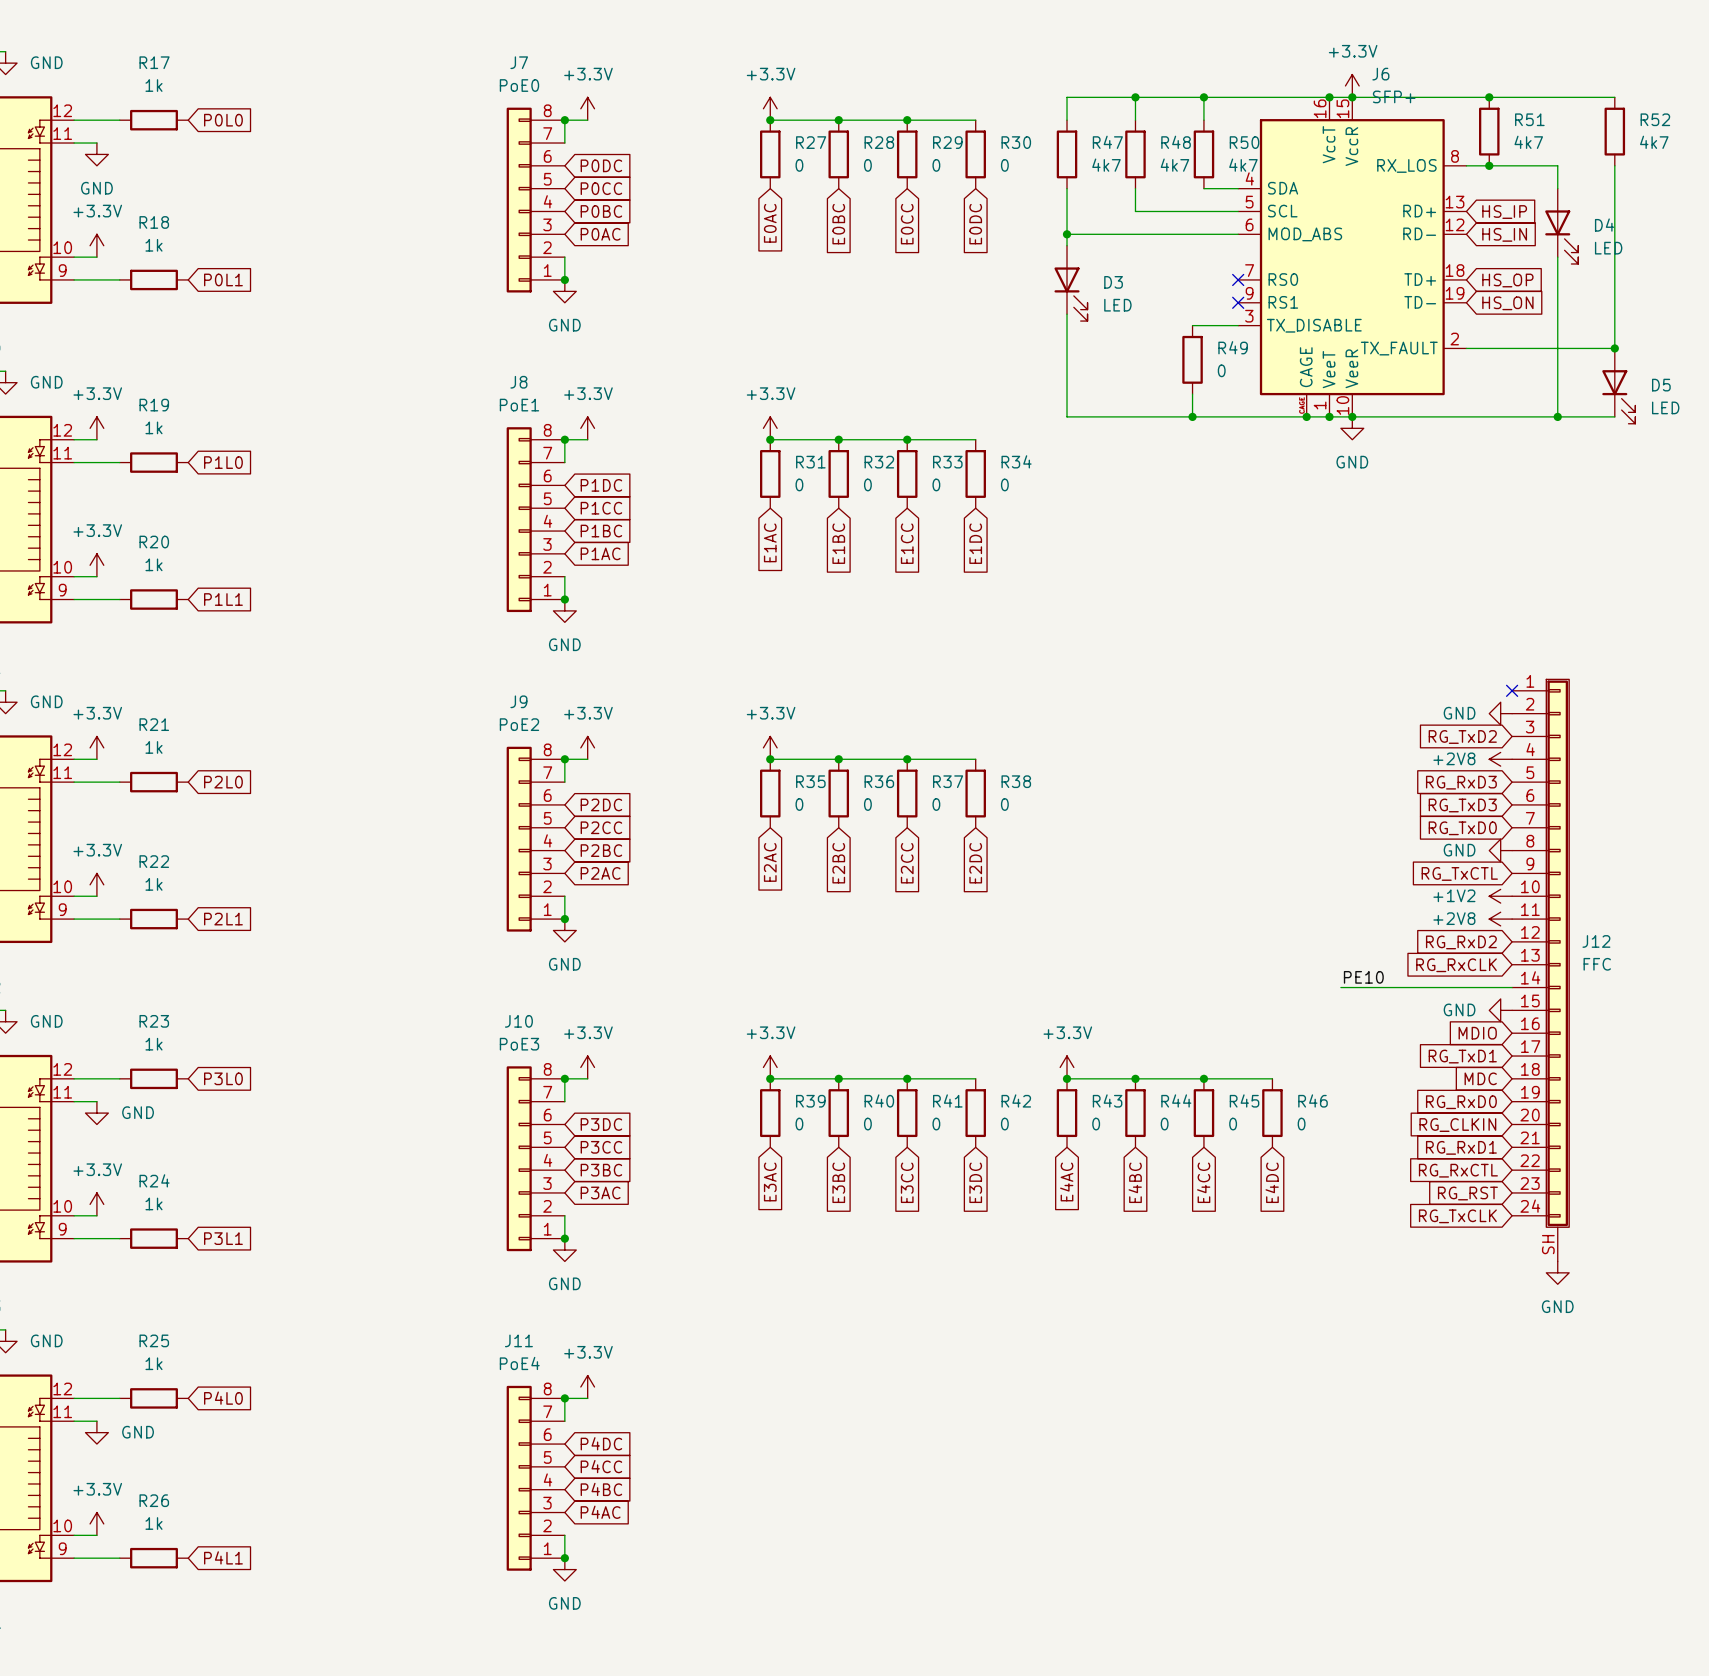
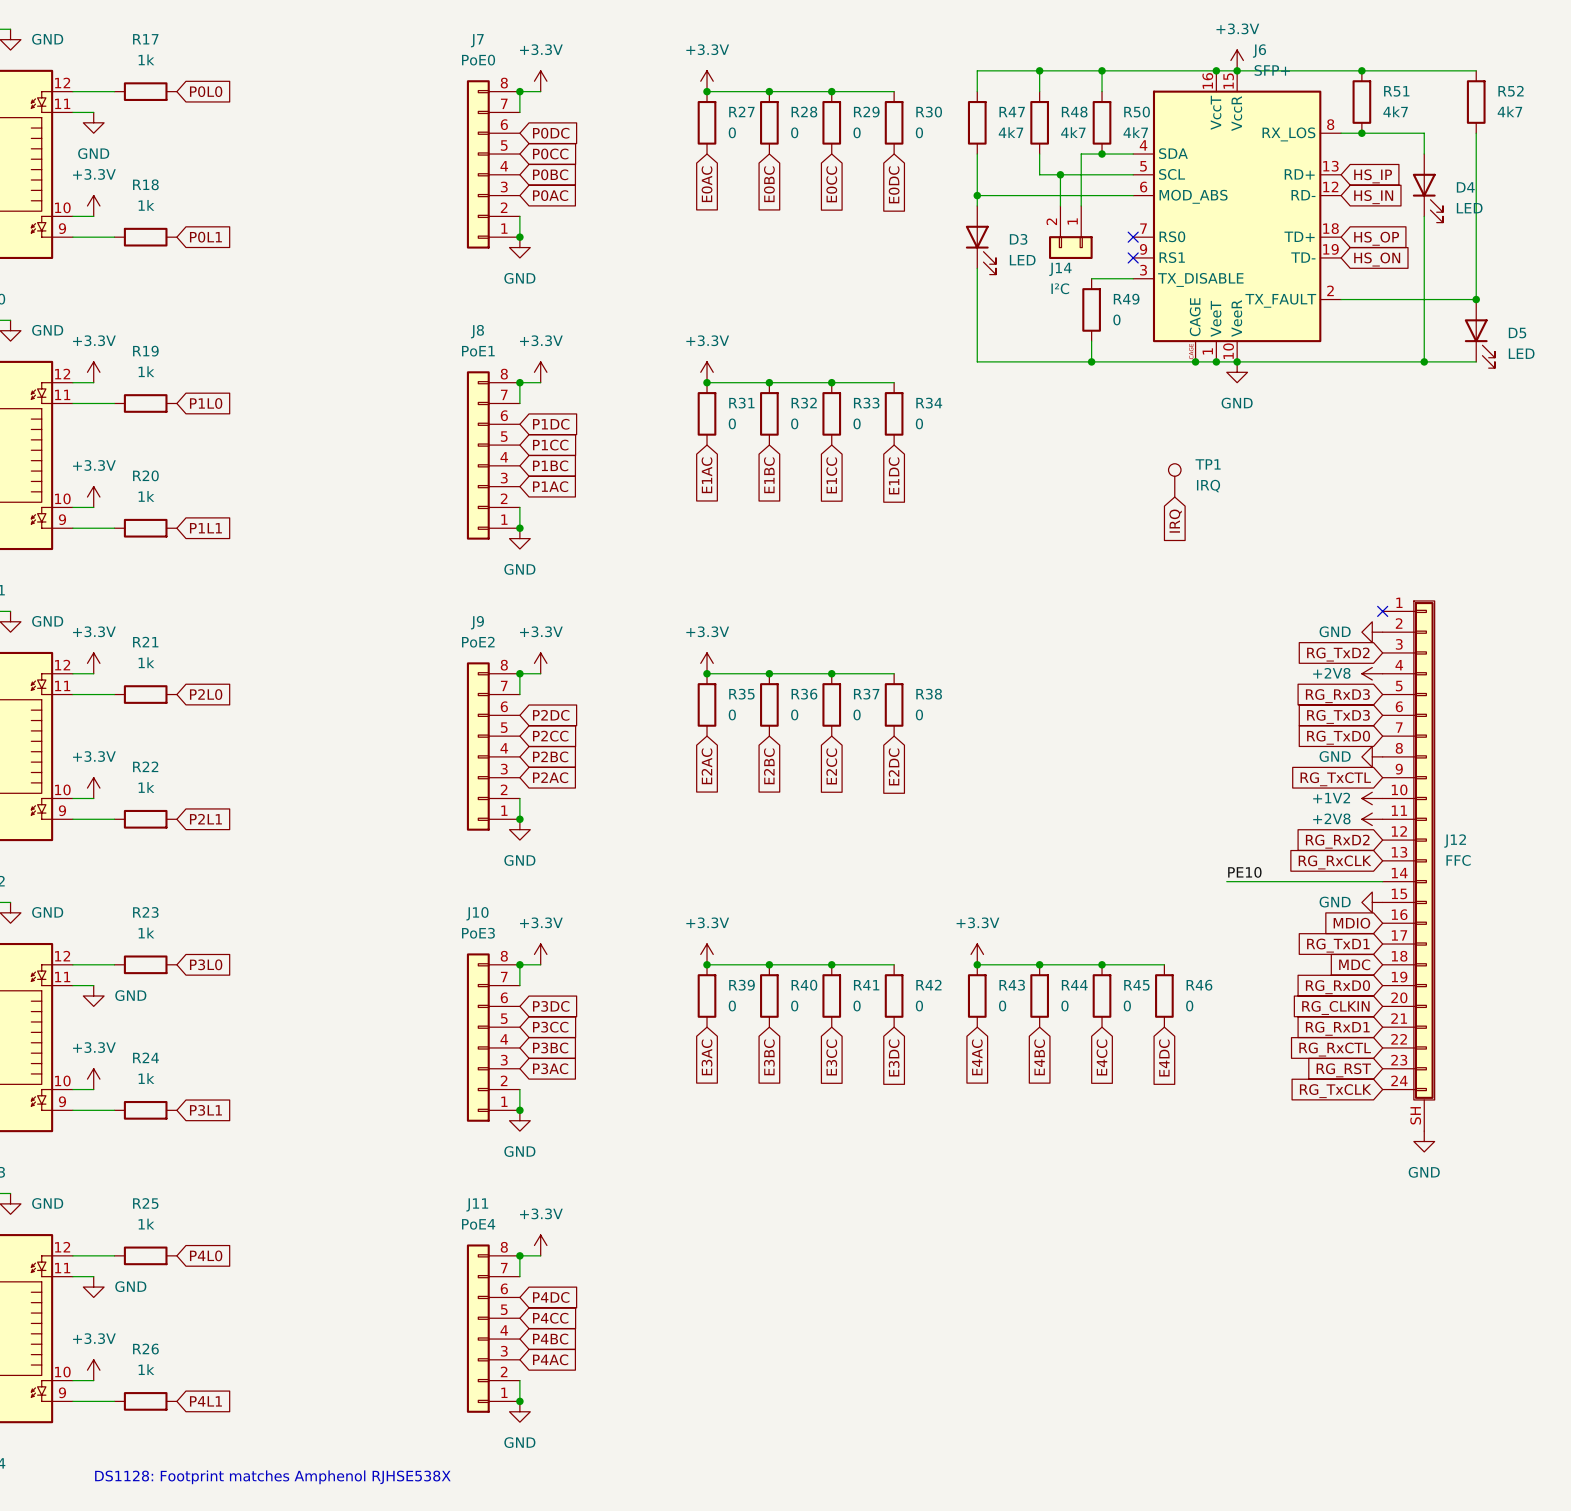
wire: none -> (1102, 154) (1081, 154) (1081, 205)
junction: none -> (1102, 154)
wire: none -> (1060, 174) (1060, 205)
junction: none -> (1060, 174)
J14: none -> I²C (1070, 232)
TP1: none -> IRQ (1174, 480)
global label: none -> IRQ (1175, 521)
text: none -> DS1128: Footprint matches Amphenol RJHSE538X (272, 1477)

